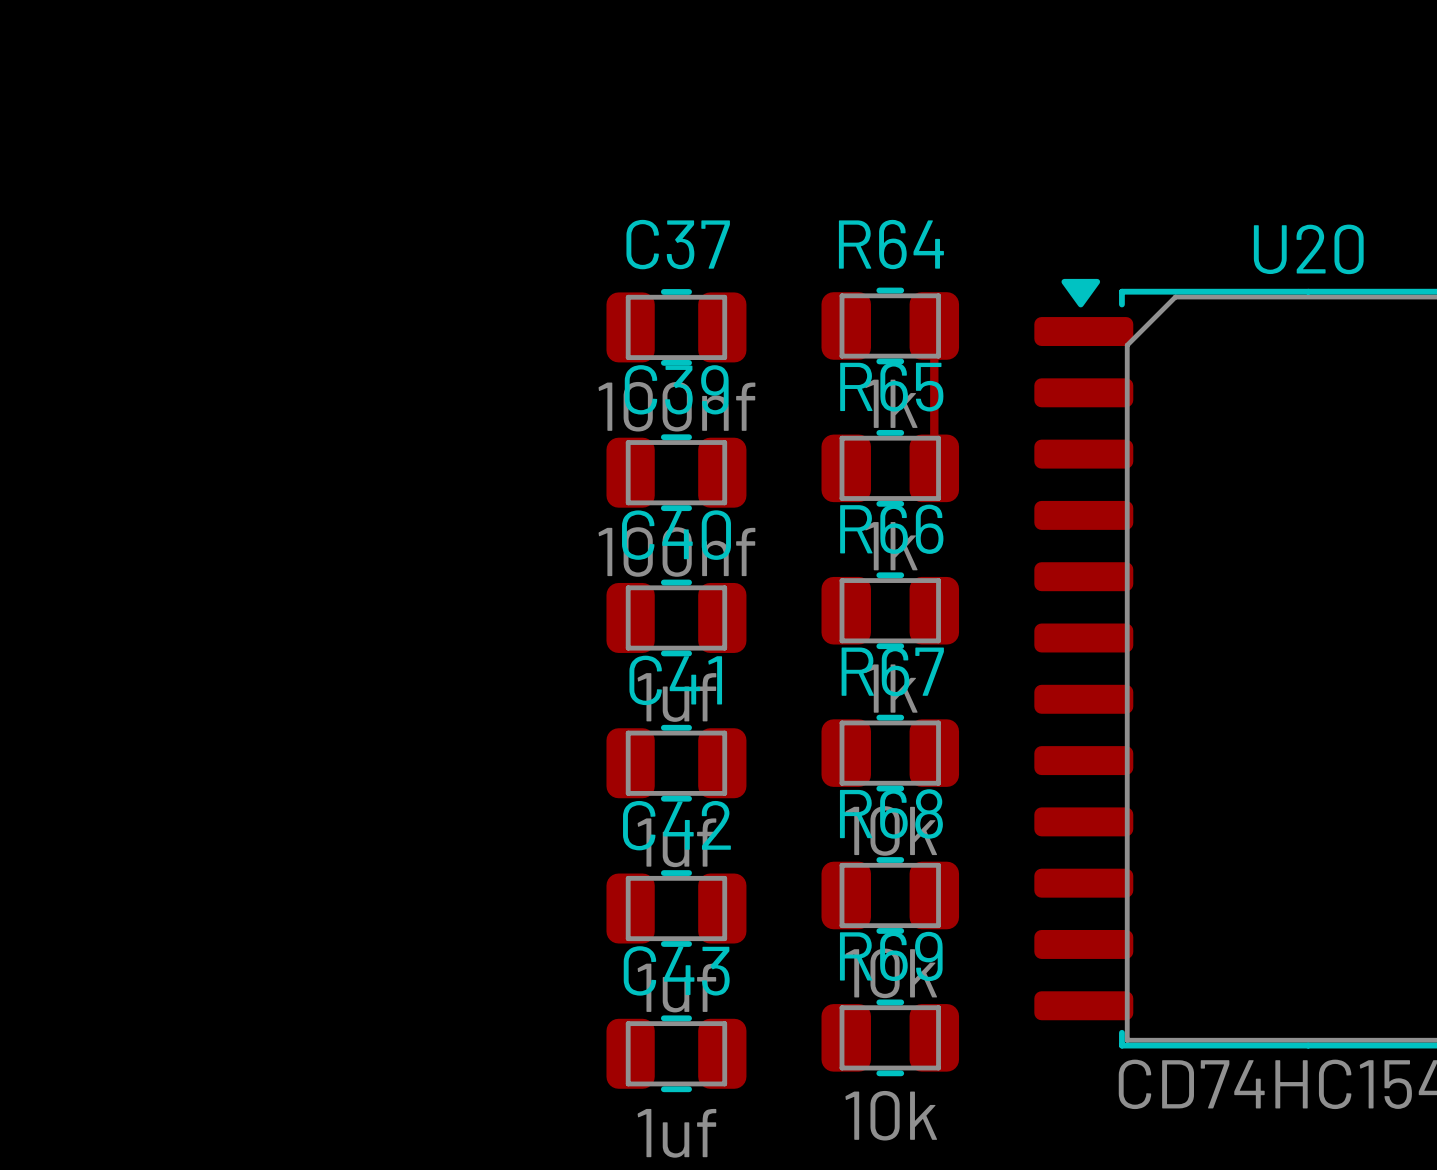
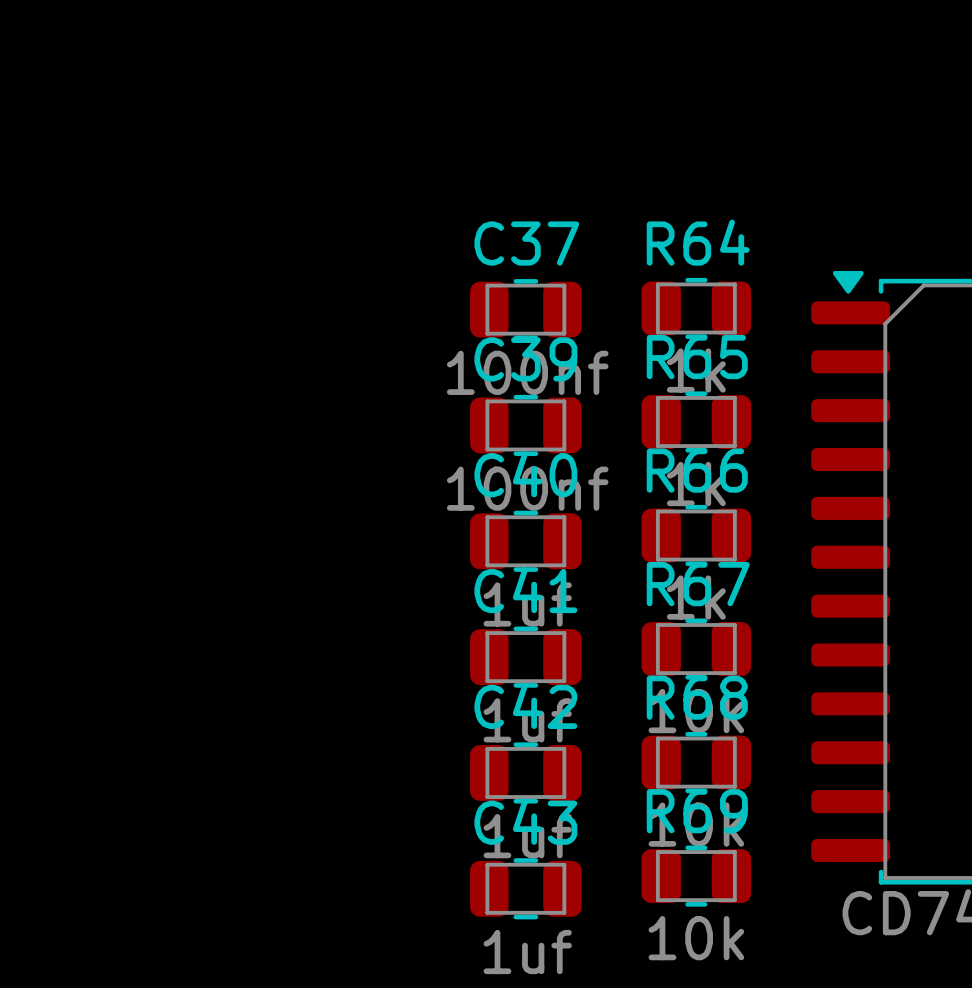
top track: (934, 325) (934, 468) -> none

